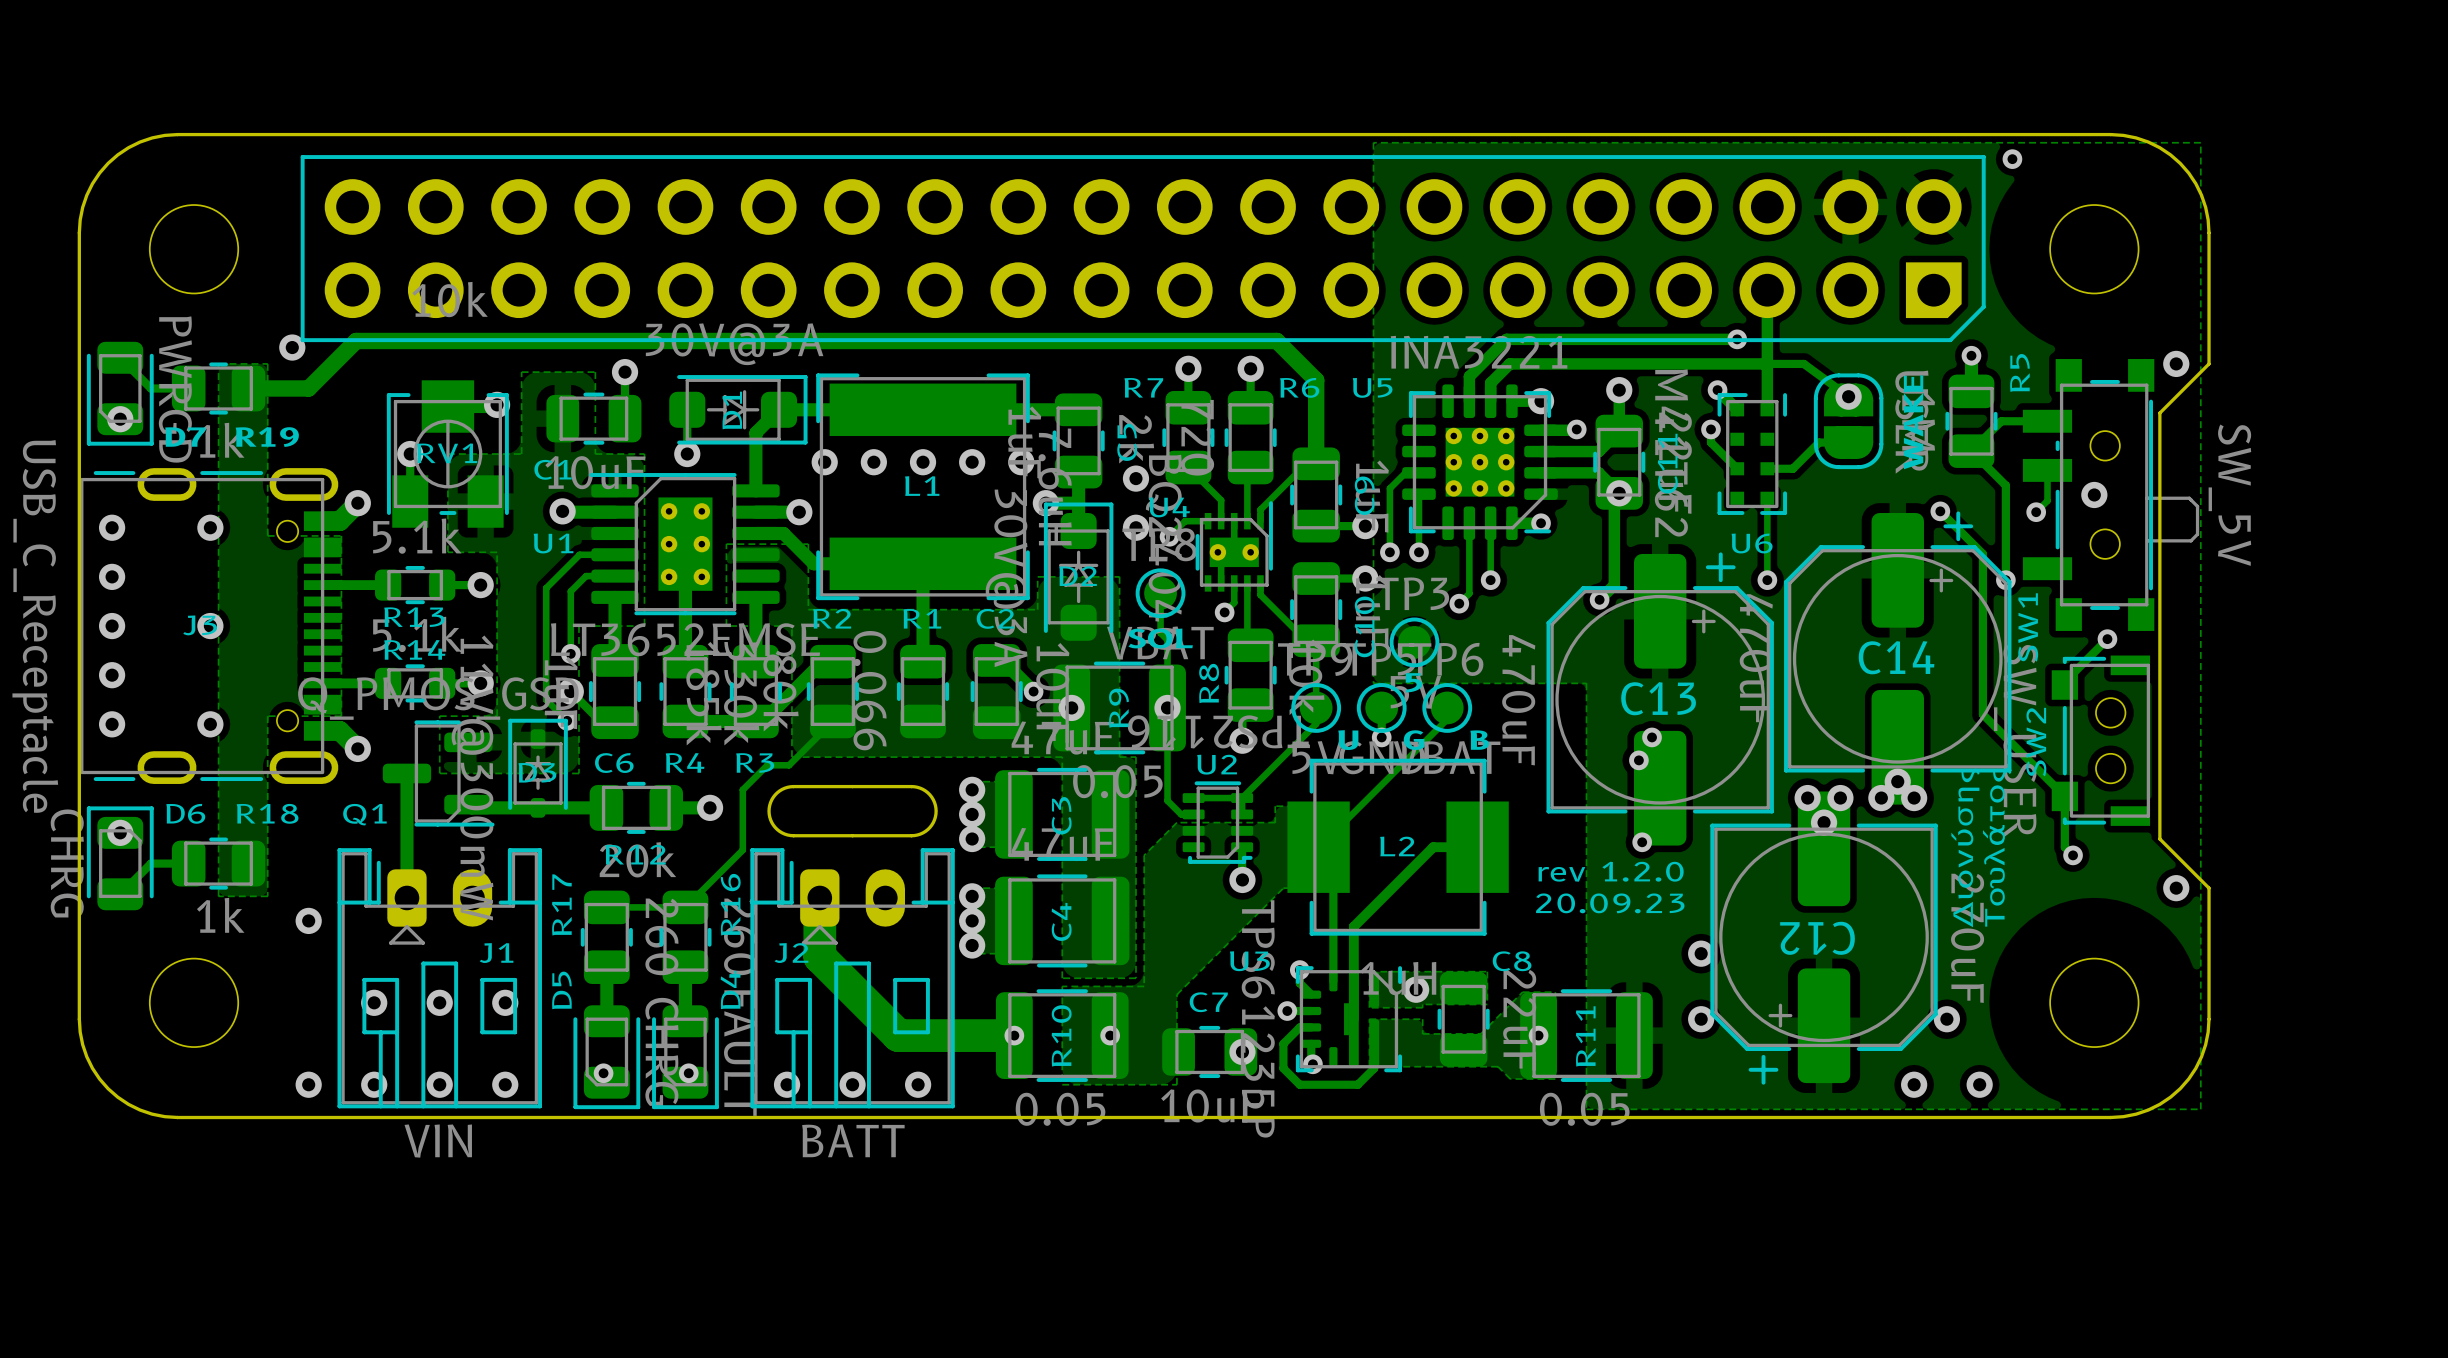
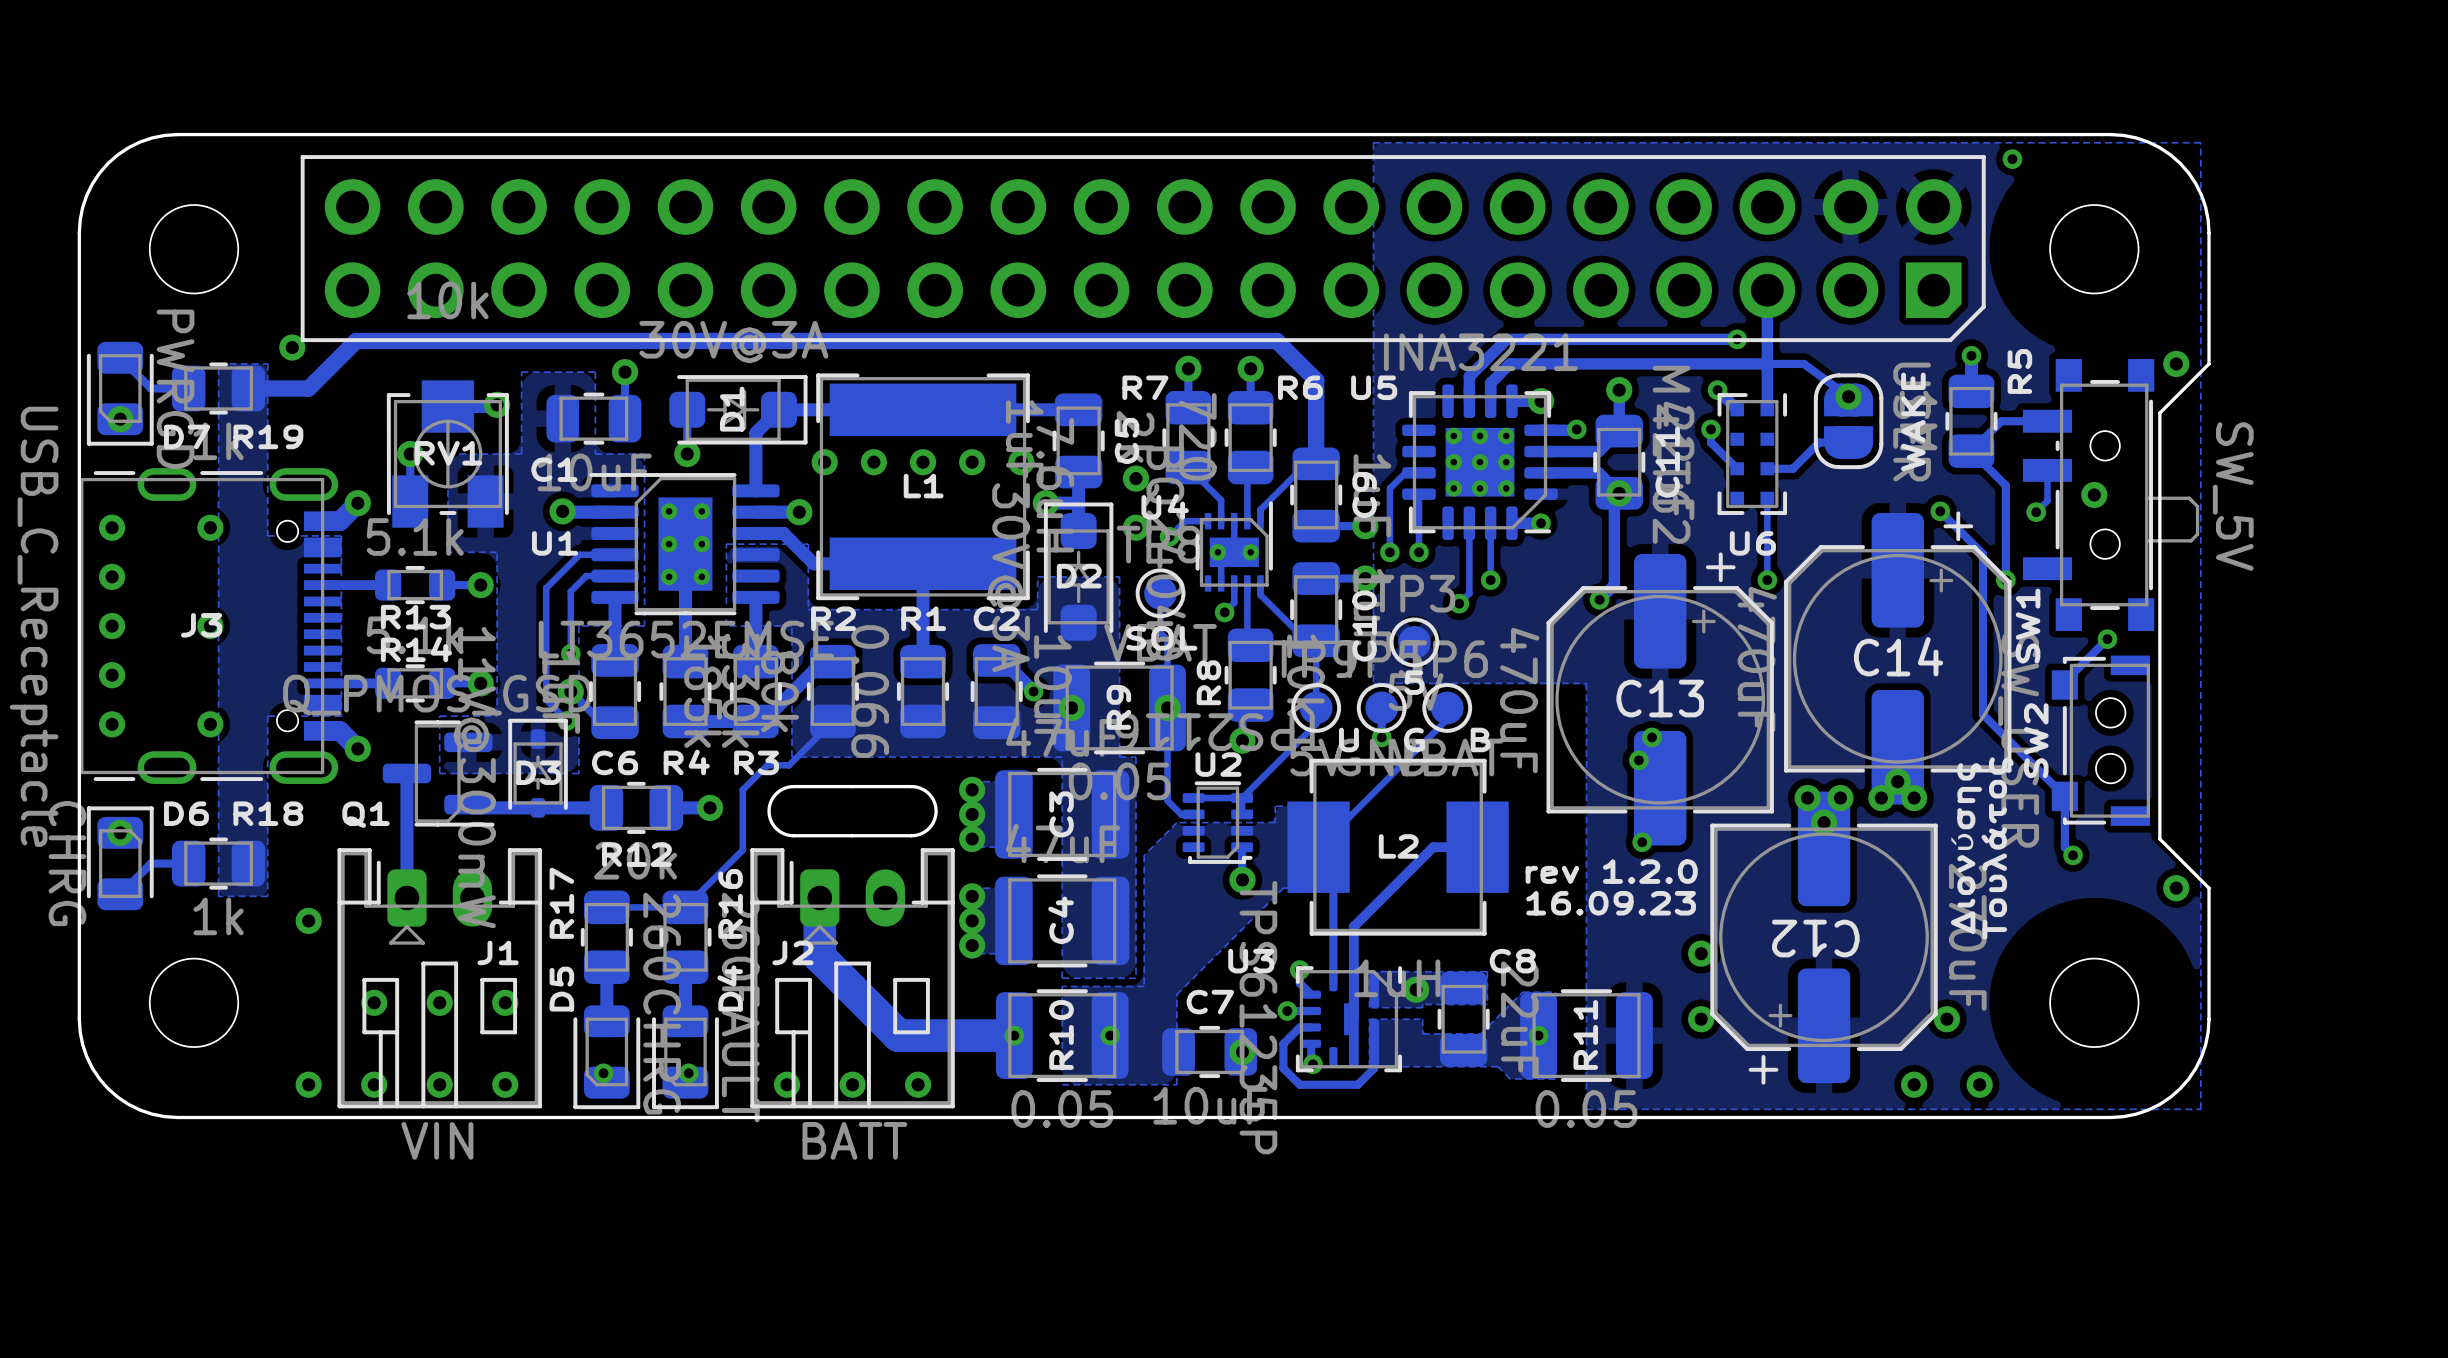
text: 20.09.23 (1610, 903) -> 16.09.23 (1611, 903)

